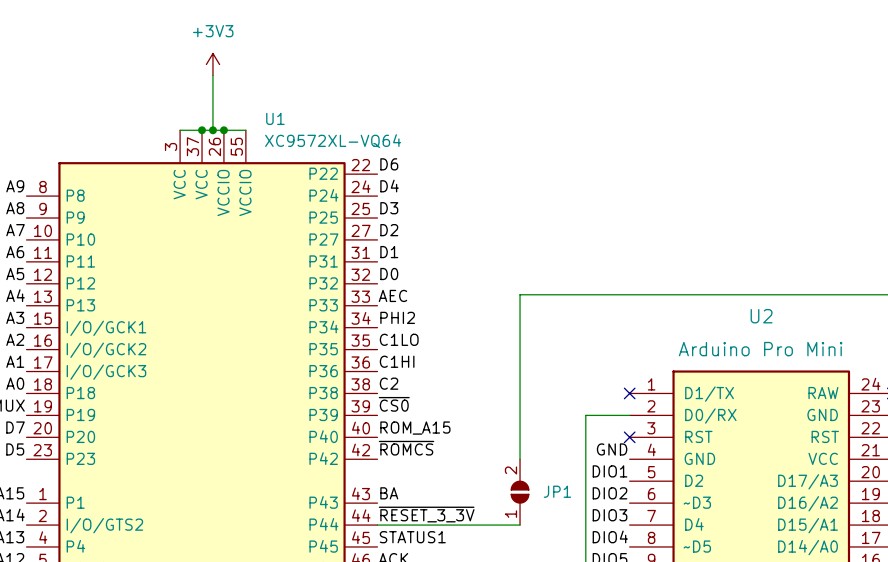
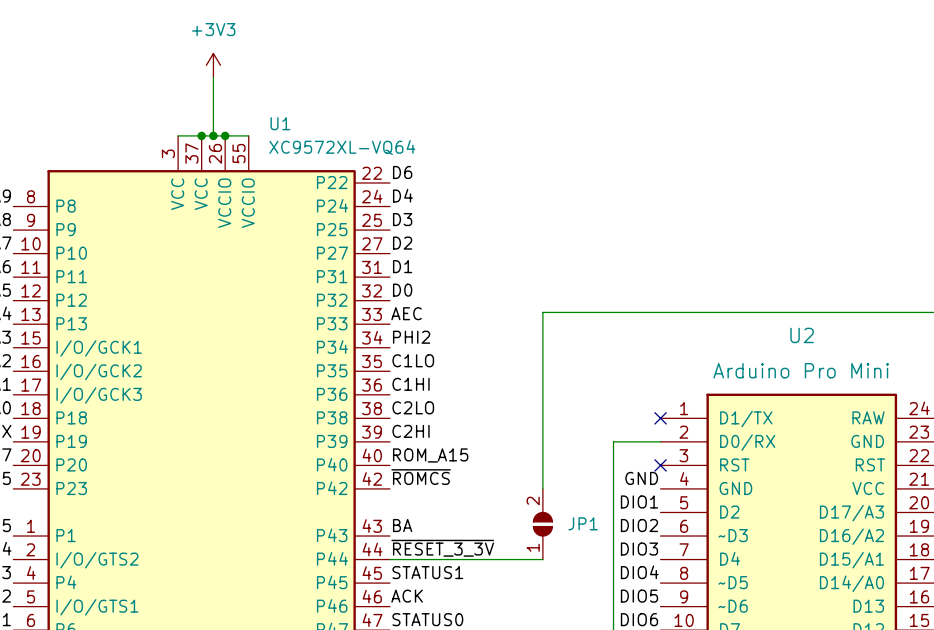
label: C2 (389, 383) -> C2LO (413, 407)
label: ~{CS0} (394, 404) -> C2HI (411, 431)

